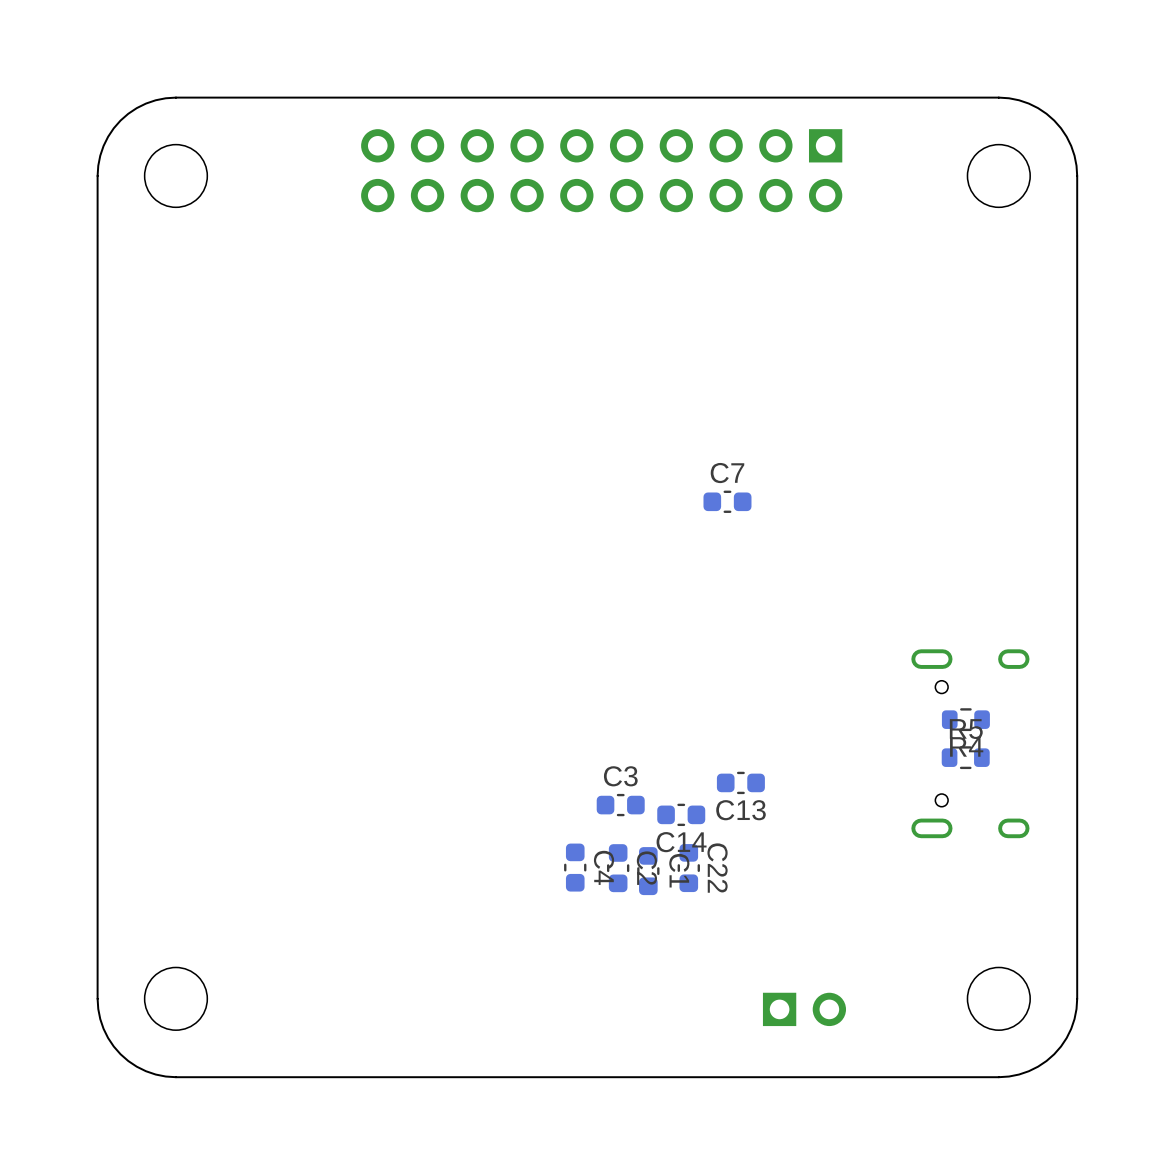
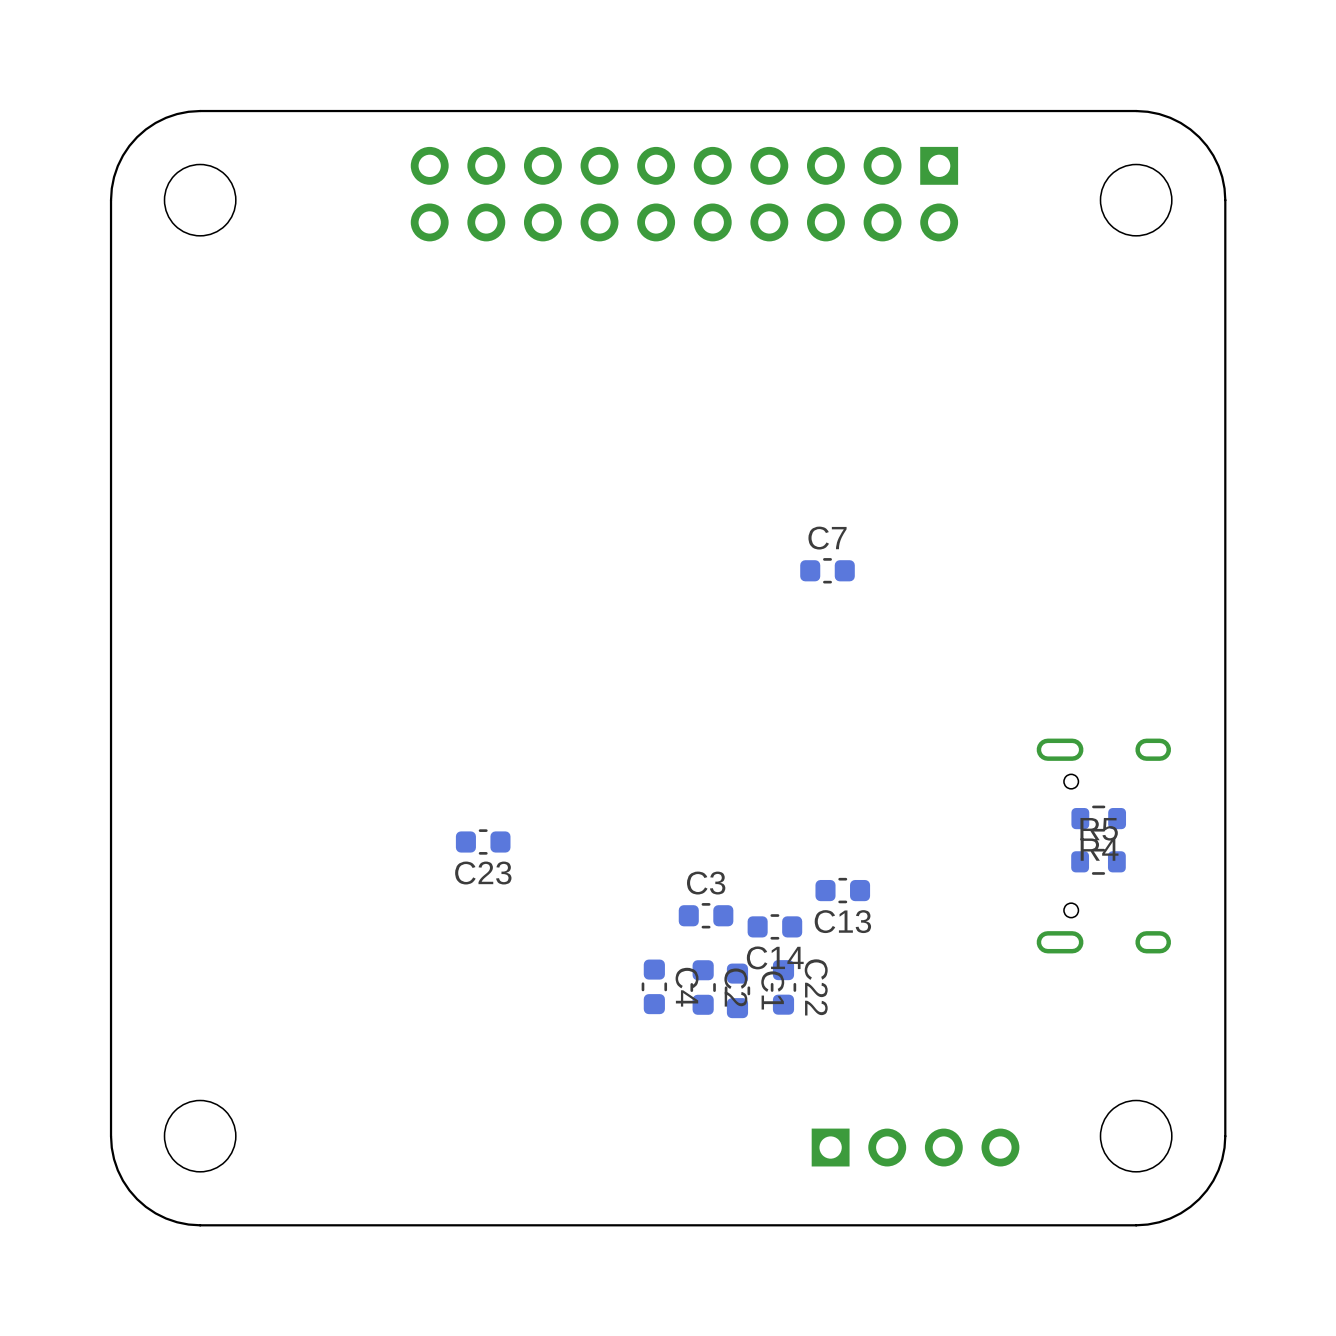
C23: none -> (483, 841)
part footprint: [762, 992, 847, 1027] -> [811, 1128, 1020, 1167]

